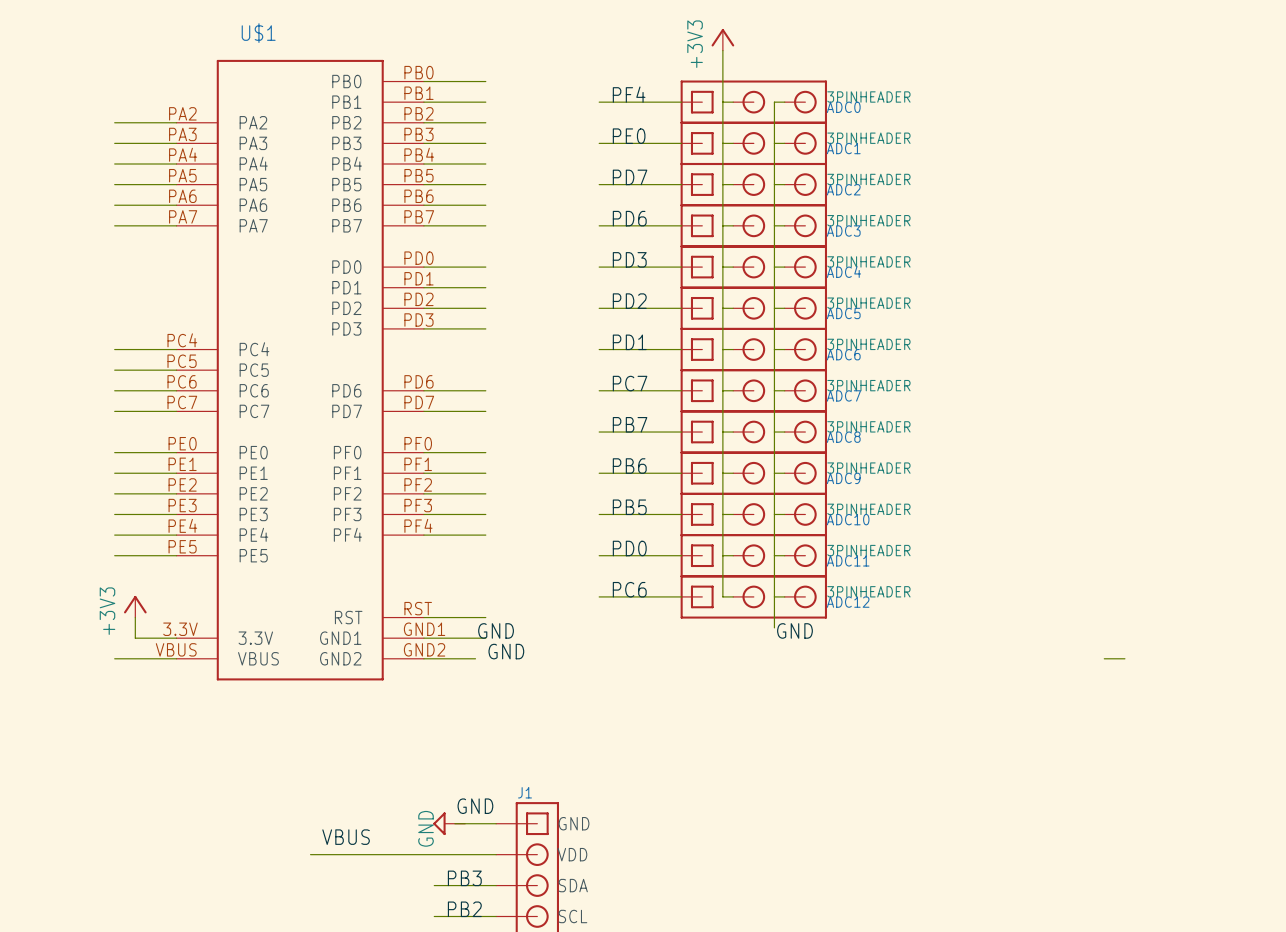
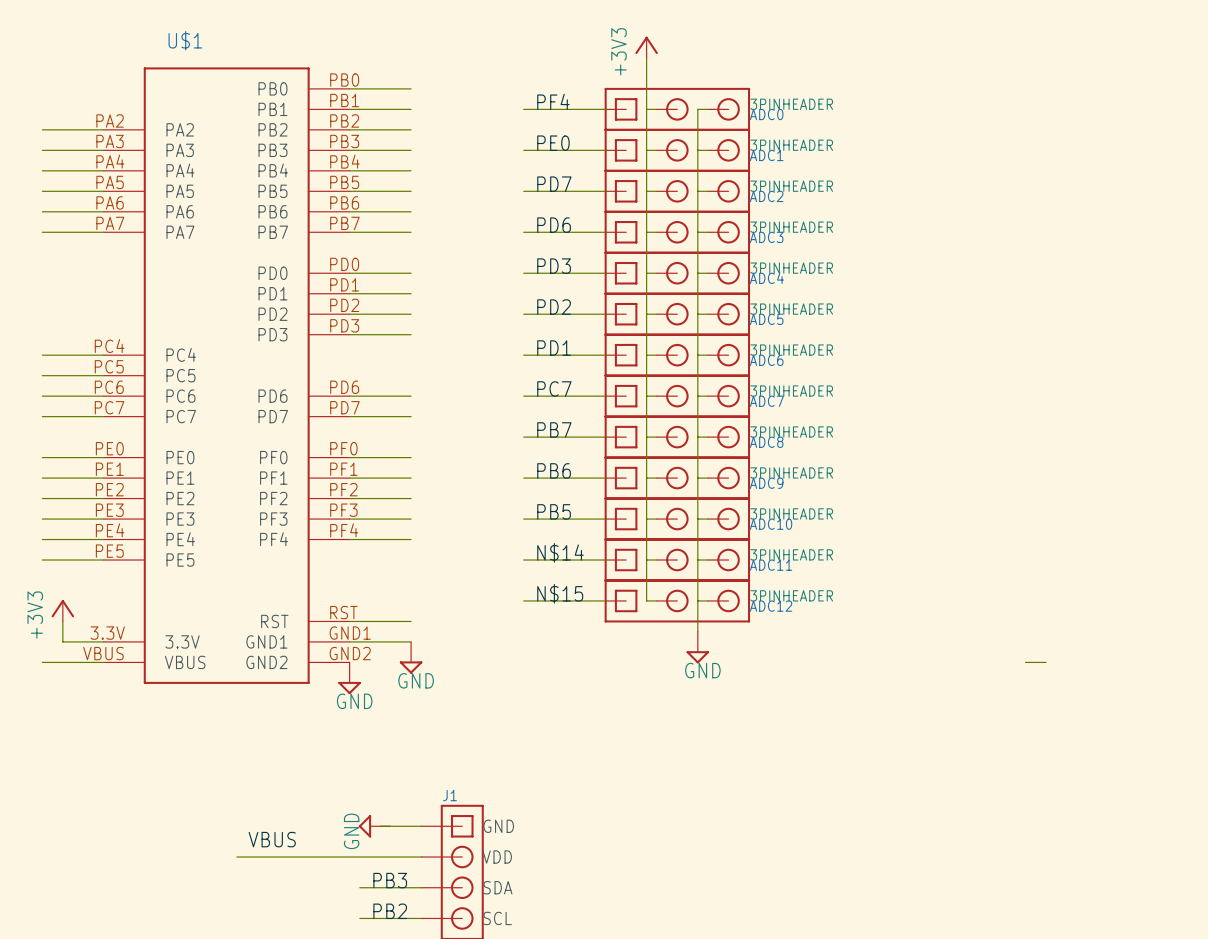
label: PD0 (629, 548) -> N$14 (560, 552)
label: PC6 (629, 589) -> N$15 (560, 593)
label: GND (496, 630) -> none
label: GND (794, 630) -> none
power symbol: none -> GND (697, 647)
label: GND (506, 651) -> none
power symbol: none -> GND (411, 657)
wire: (423, 658) (475, 658) -> none
power symbol: none -> GND (349, 678)
label: GND (475, 806) -> none

